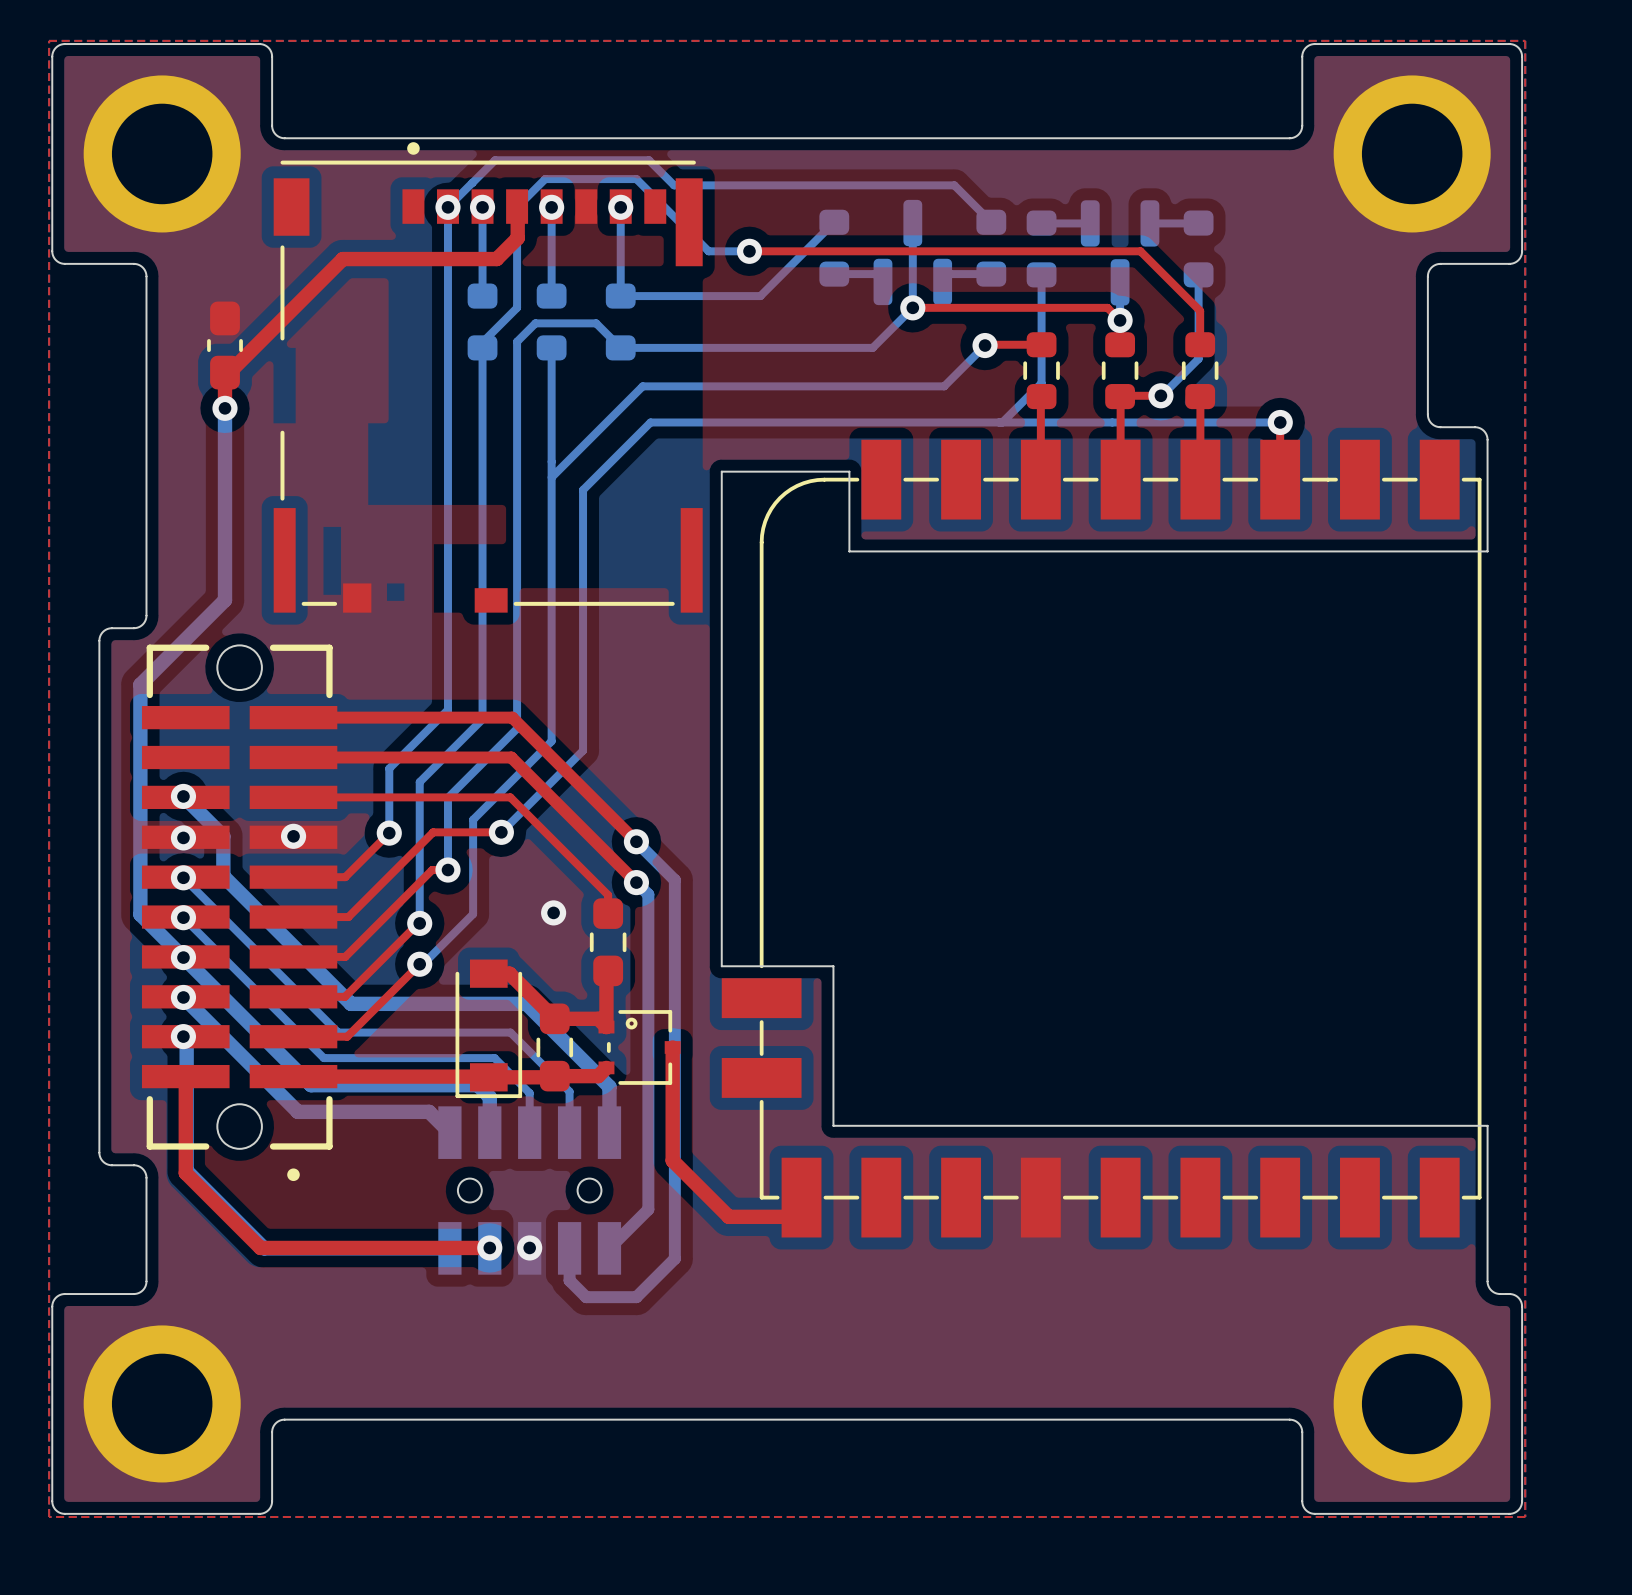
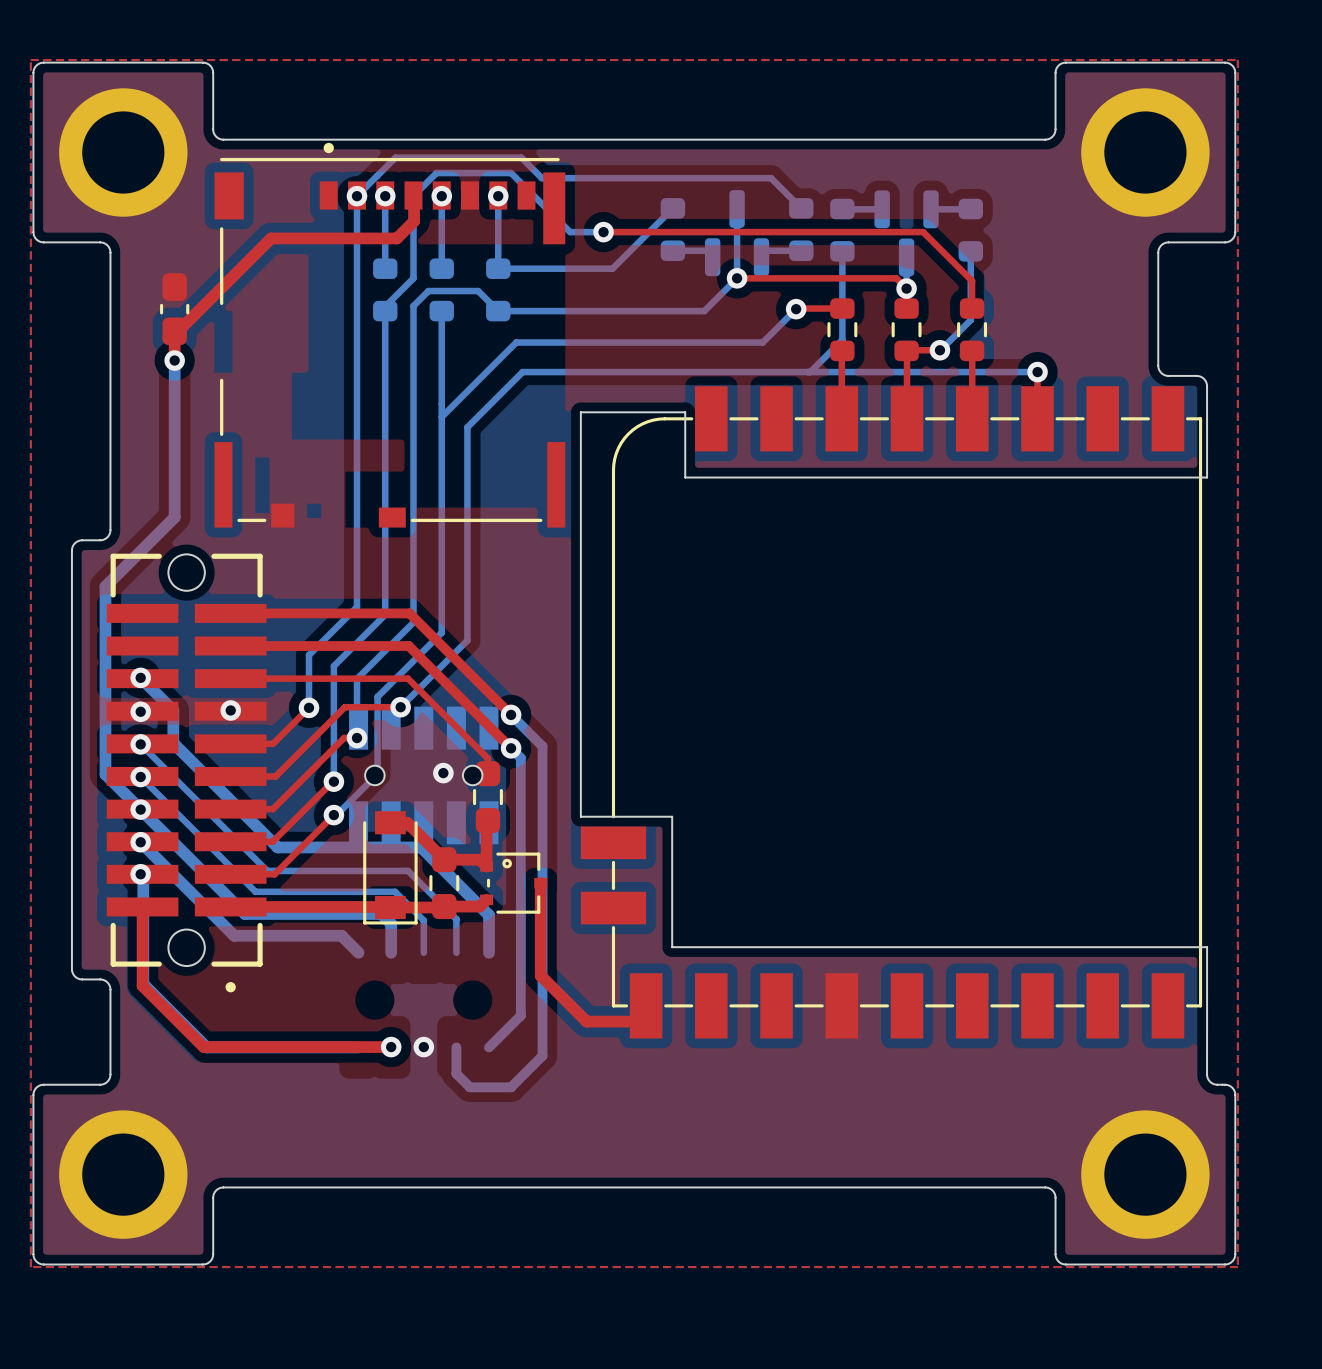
part position: (529, 1190) -> (423, 775)

